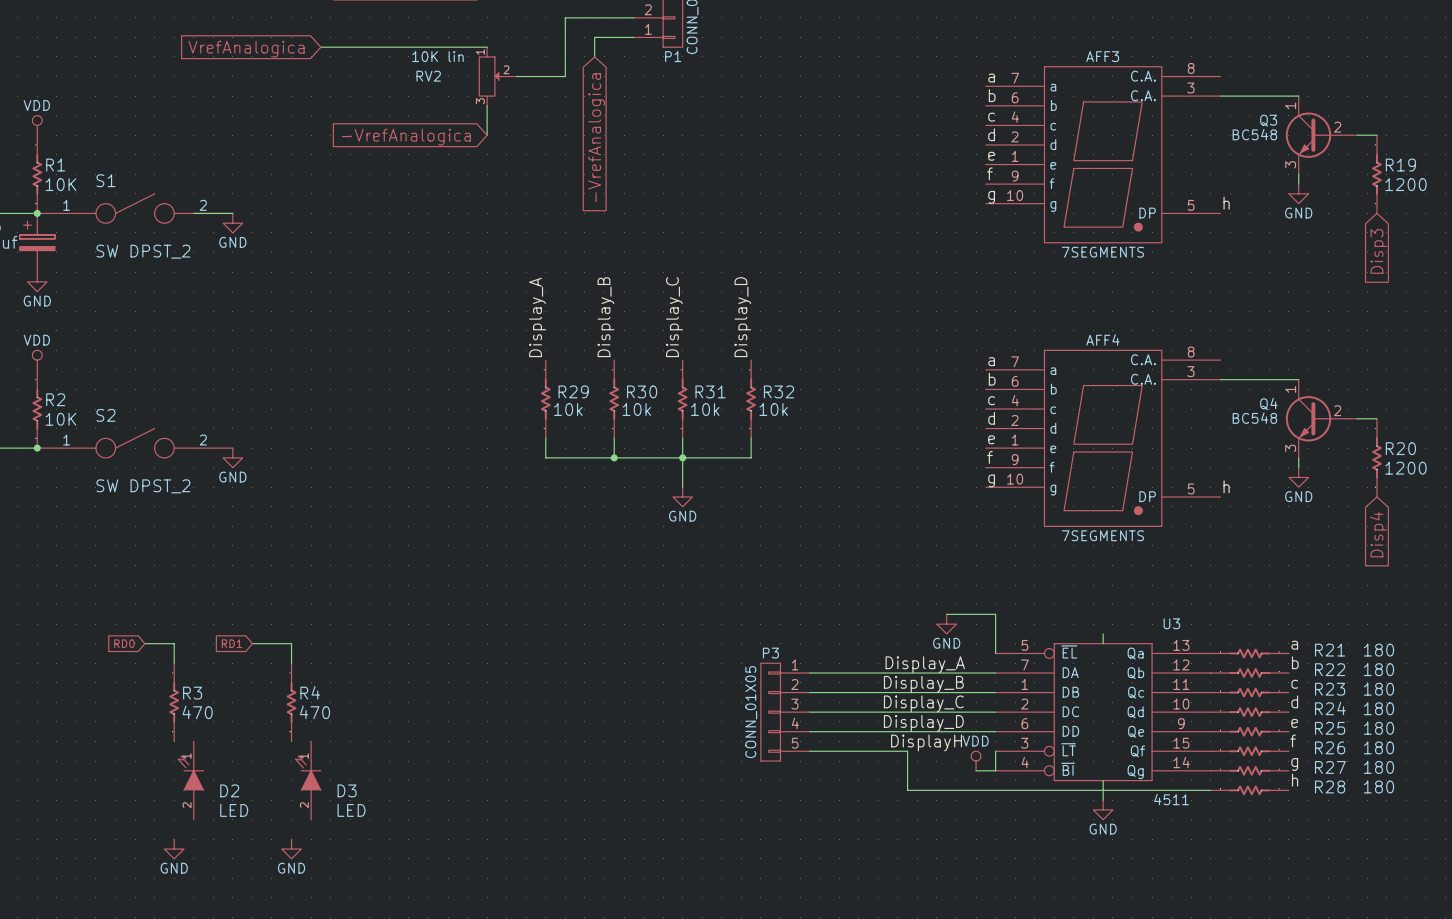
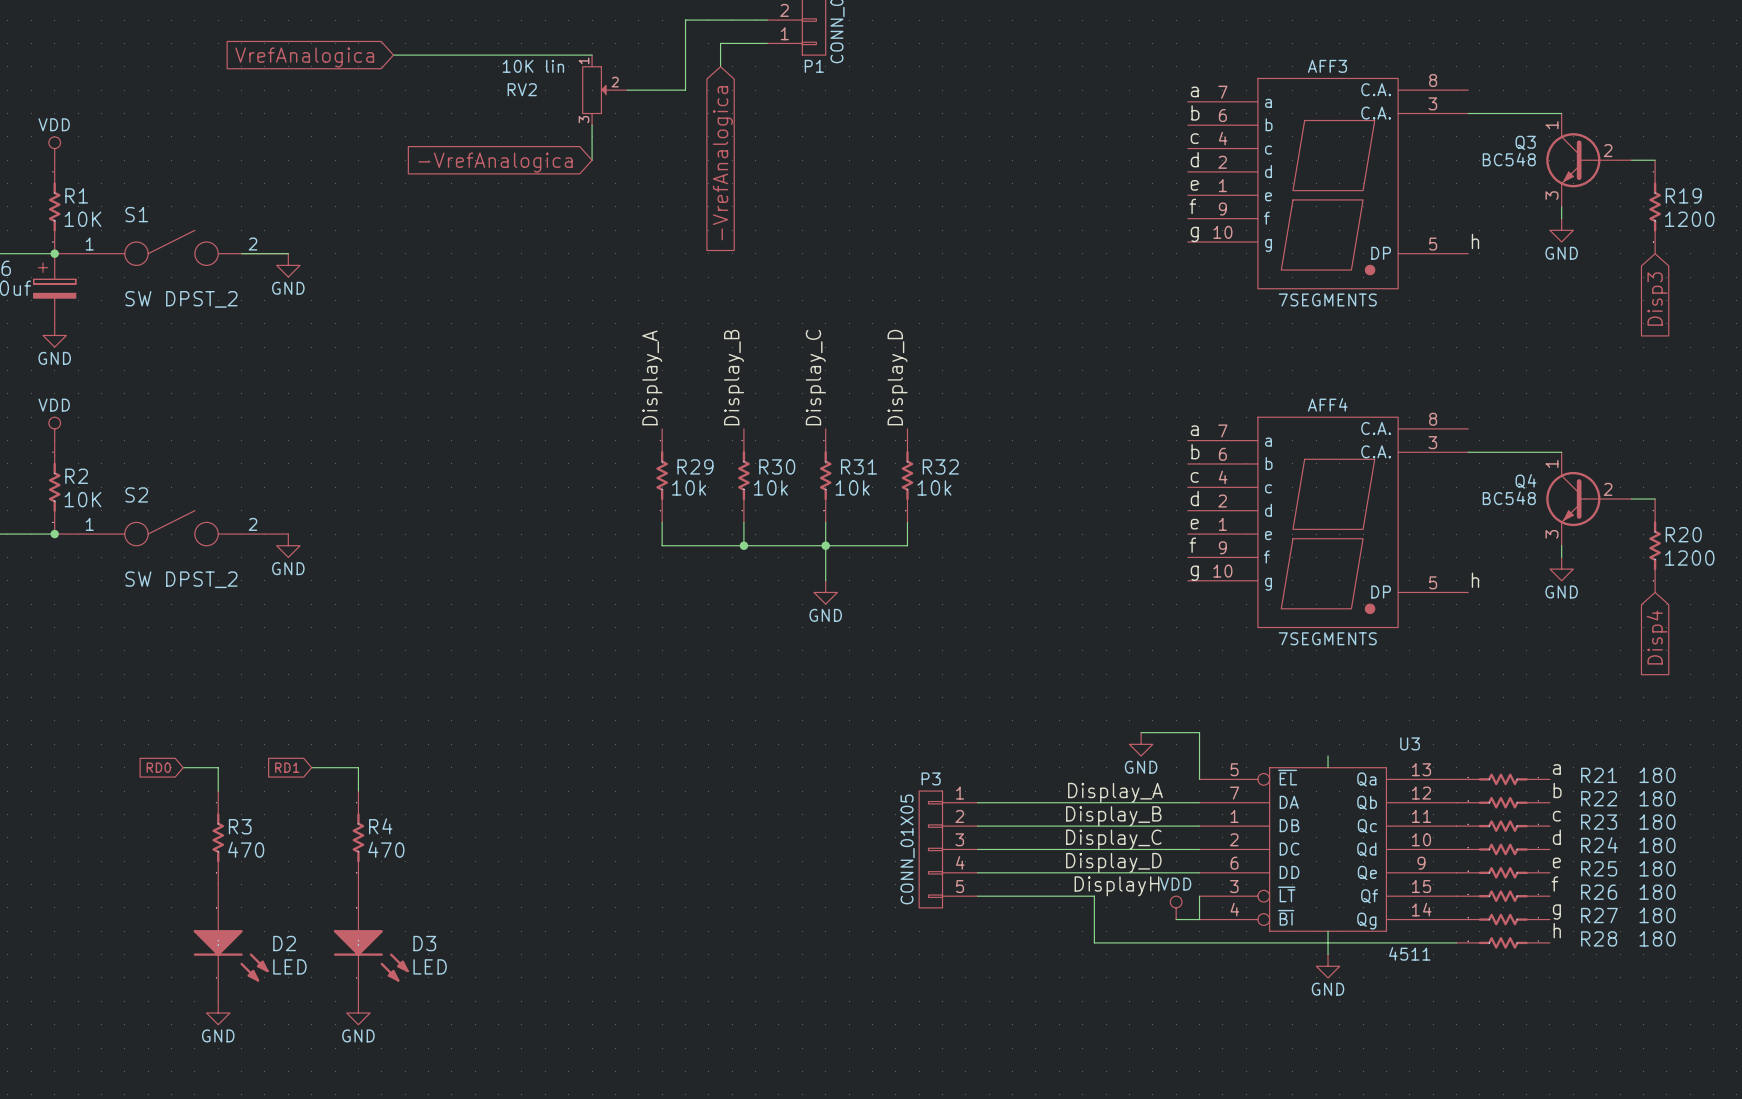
D2 symbol: [178, 741, 204, 820] -> [193, 884, 269, 1002]
D3 symbol: [295, 741, 321, 820] -> [333, 884, 409, 1002]

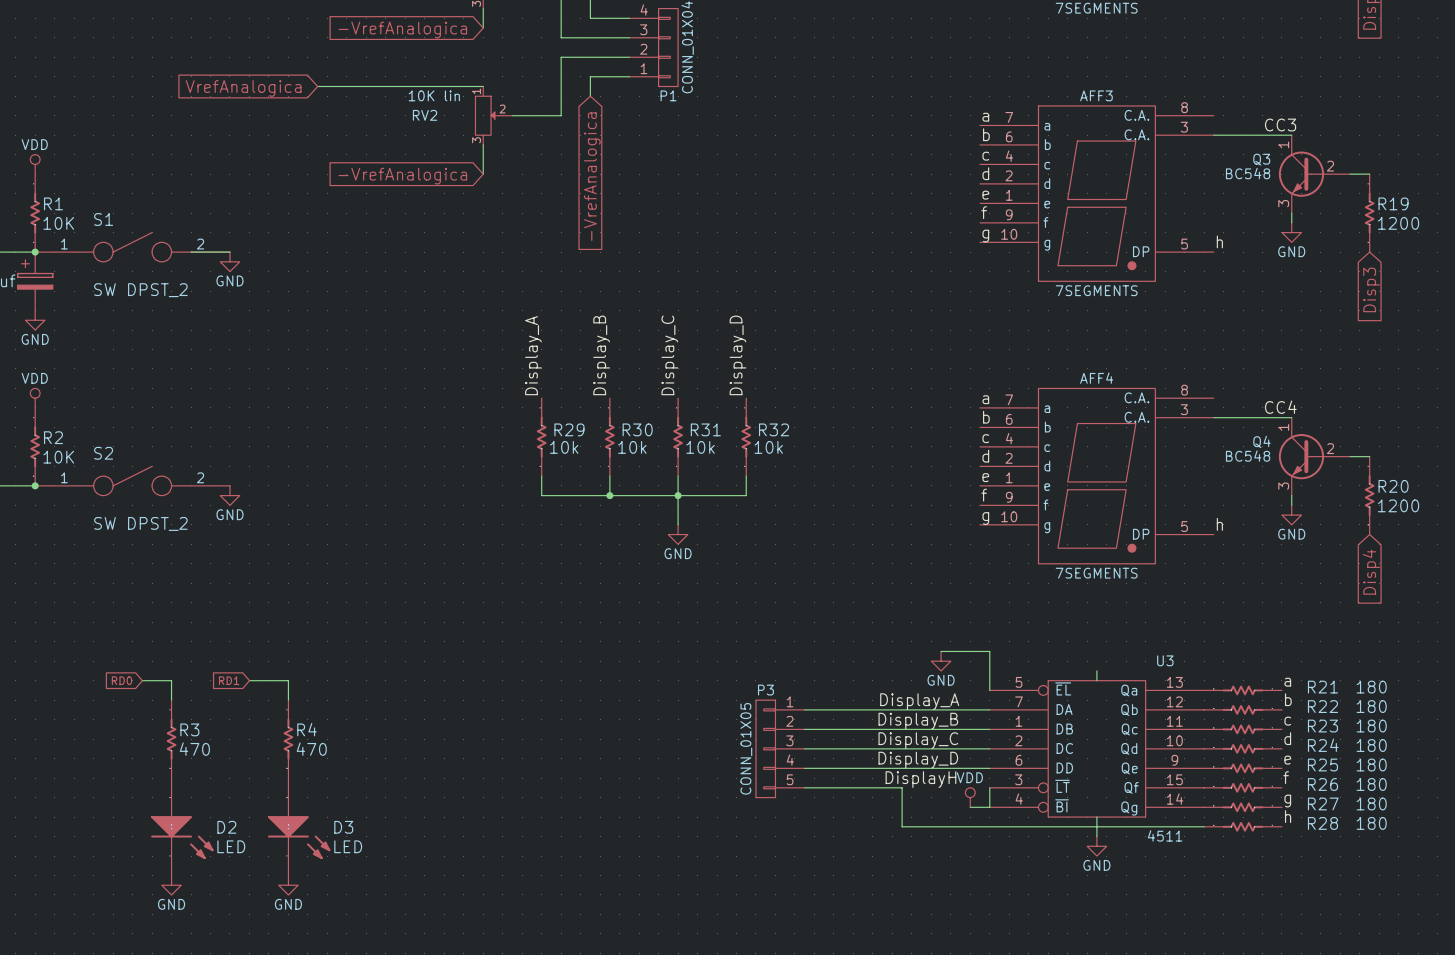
label: none -> CC3 (1280, 125)
label: none -> CC4 (1280, 407)

